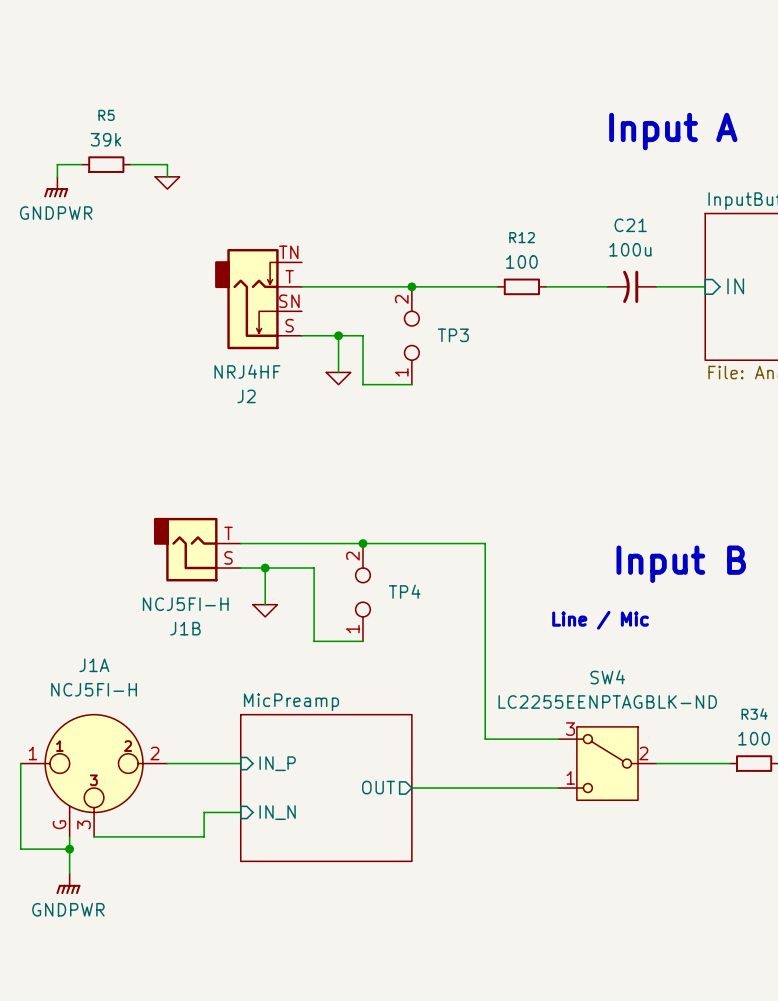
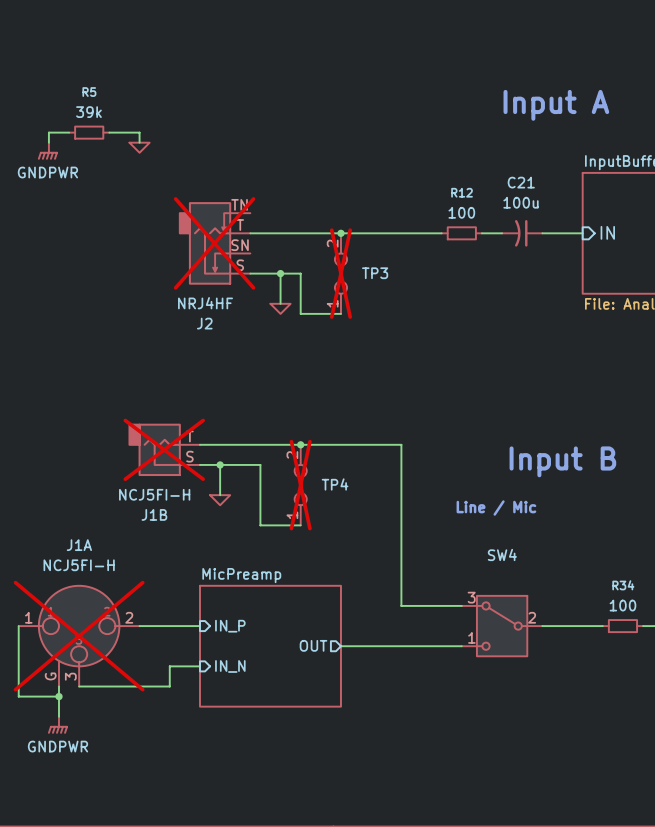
R12 position: (521, 286) -> (461, 233)
wire: (546, 286) (583, 286) -> (411, 233) (441, 233)
J2 do-not-place cross: none -> (214, 243)
TP3 do-not-place cross: none -> (340, 273)
J1B do-not-place cross: none -> (164, 449)
TP4 do-not-place cross: none -> (300, 485)
SW4 value: LC2255EENPTAGBLK-ND (607, 701) -> none
J1A do-not-place cross: none -> (79, 636)

